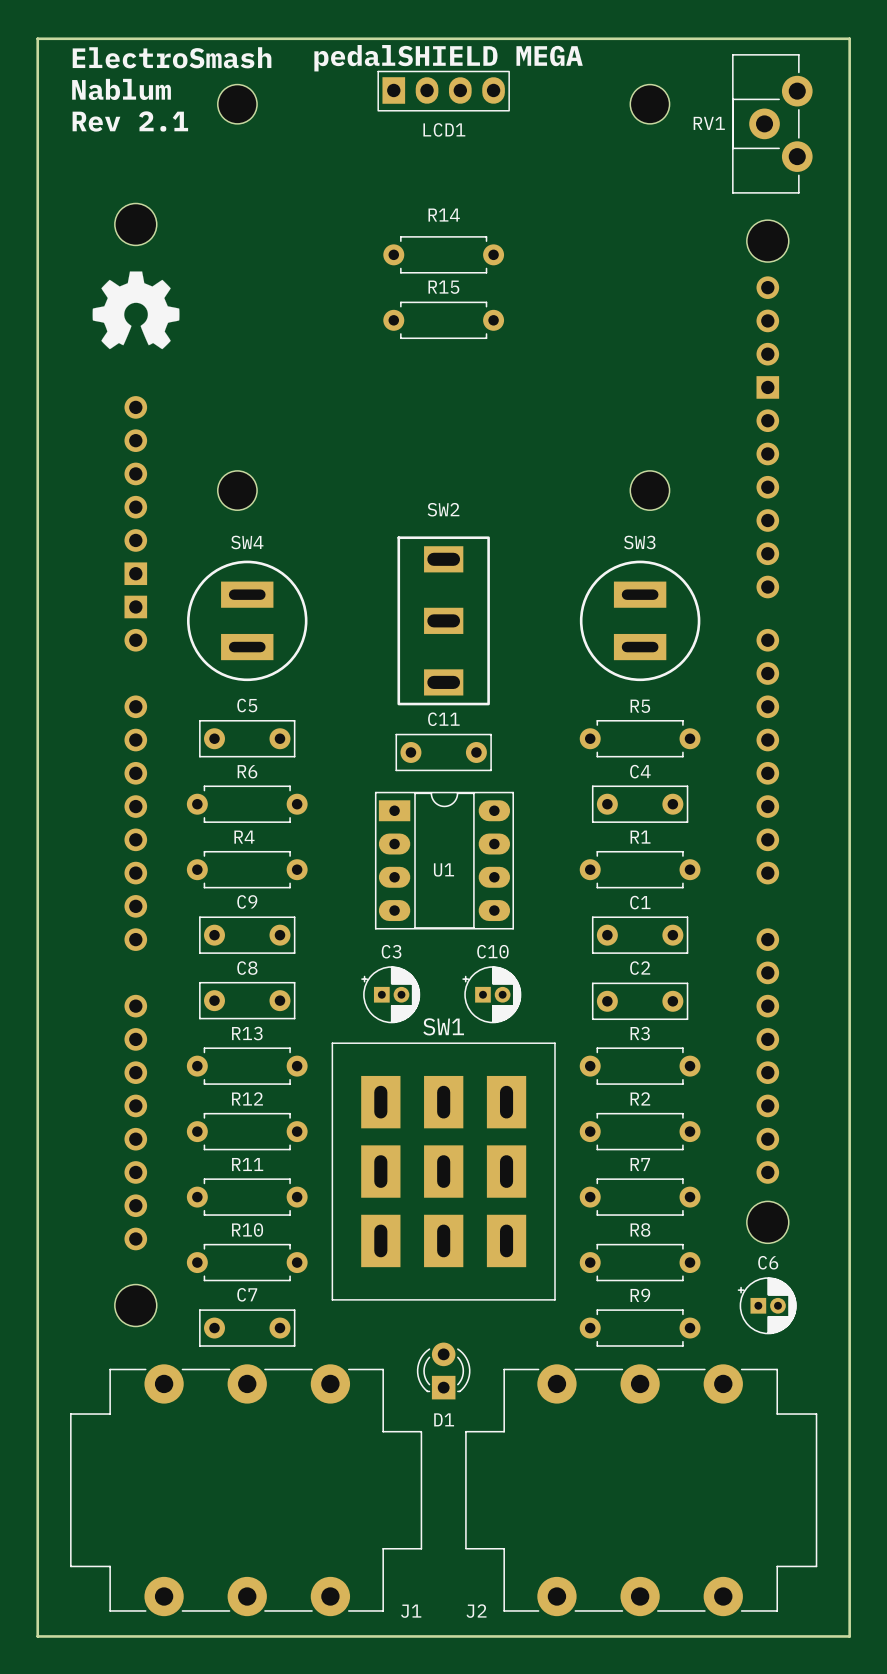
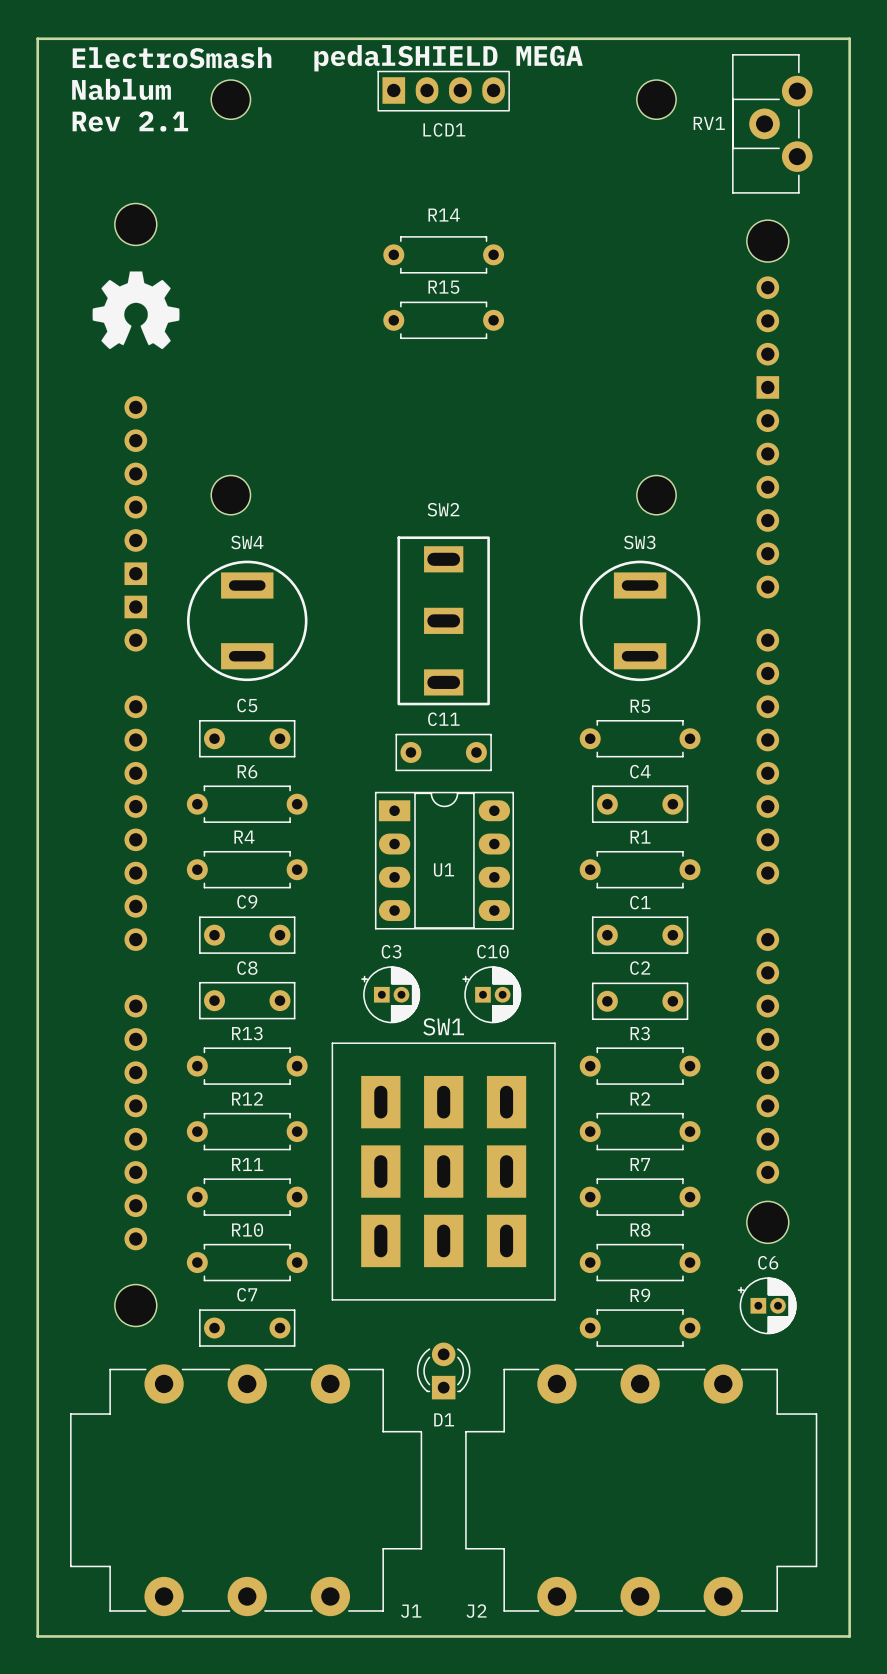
LCD1 footprint: [217, 70, 670, 511] -> [211, 70, 677, 515]
SW4 footprint: [187, 560, 308, 682] -> [187, 560, 308, 682]
SW3 footprint: [579, 560, 701, 682] -> [579, 560, 701, 682]

